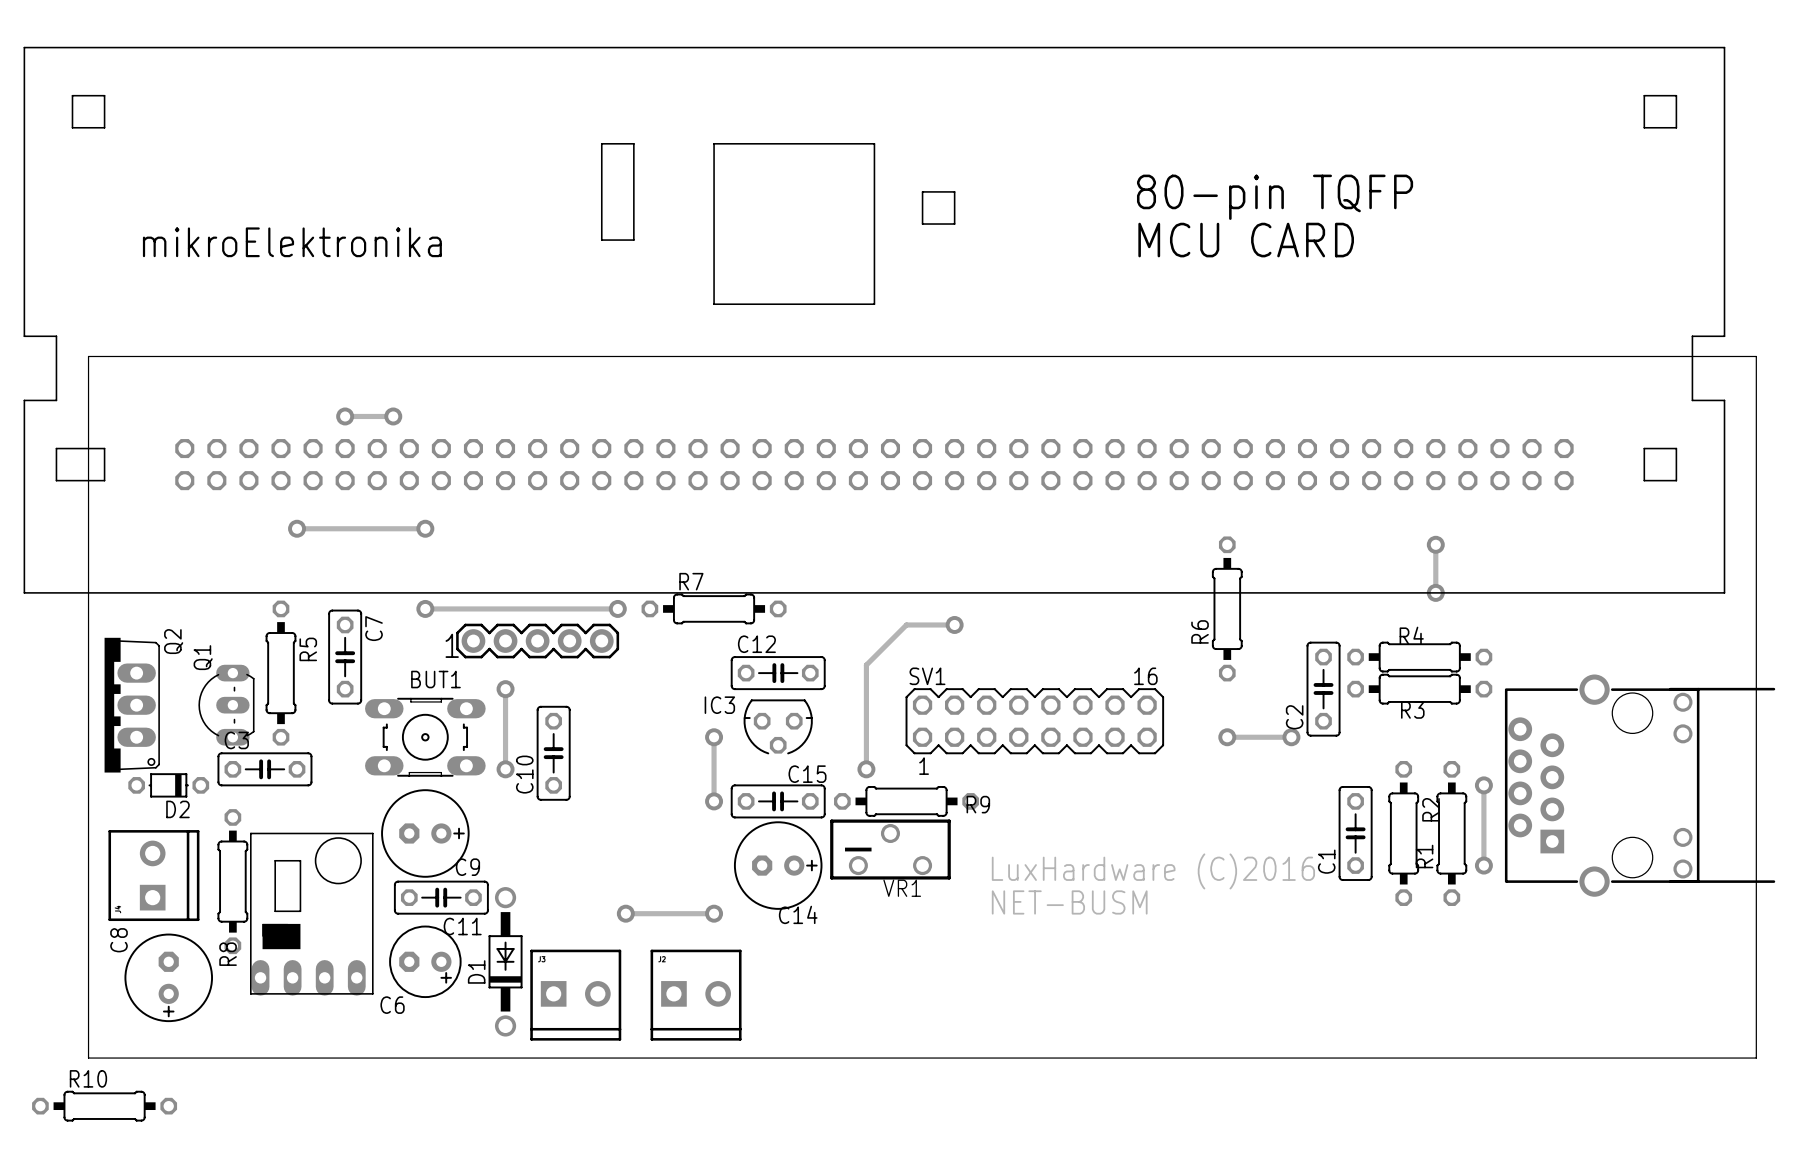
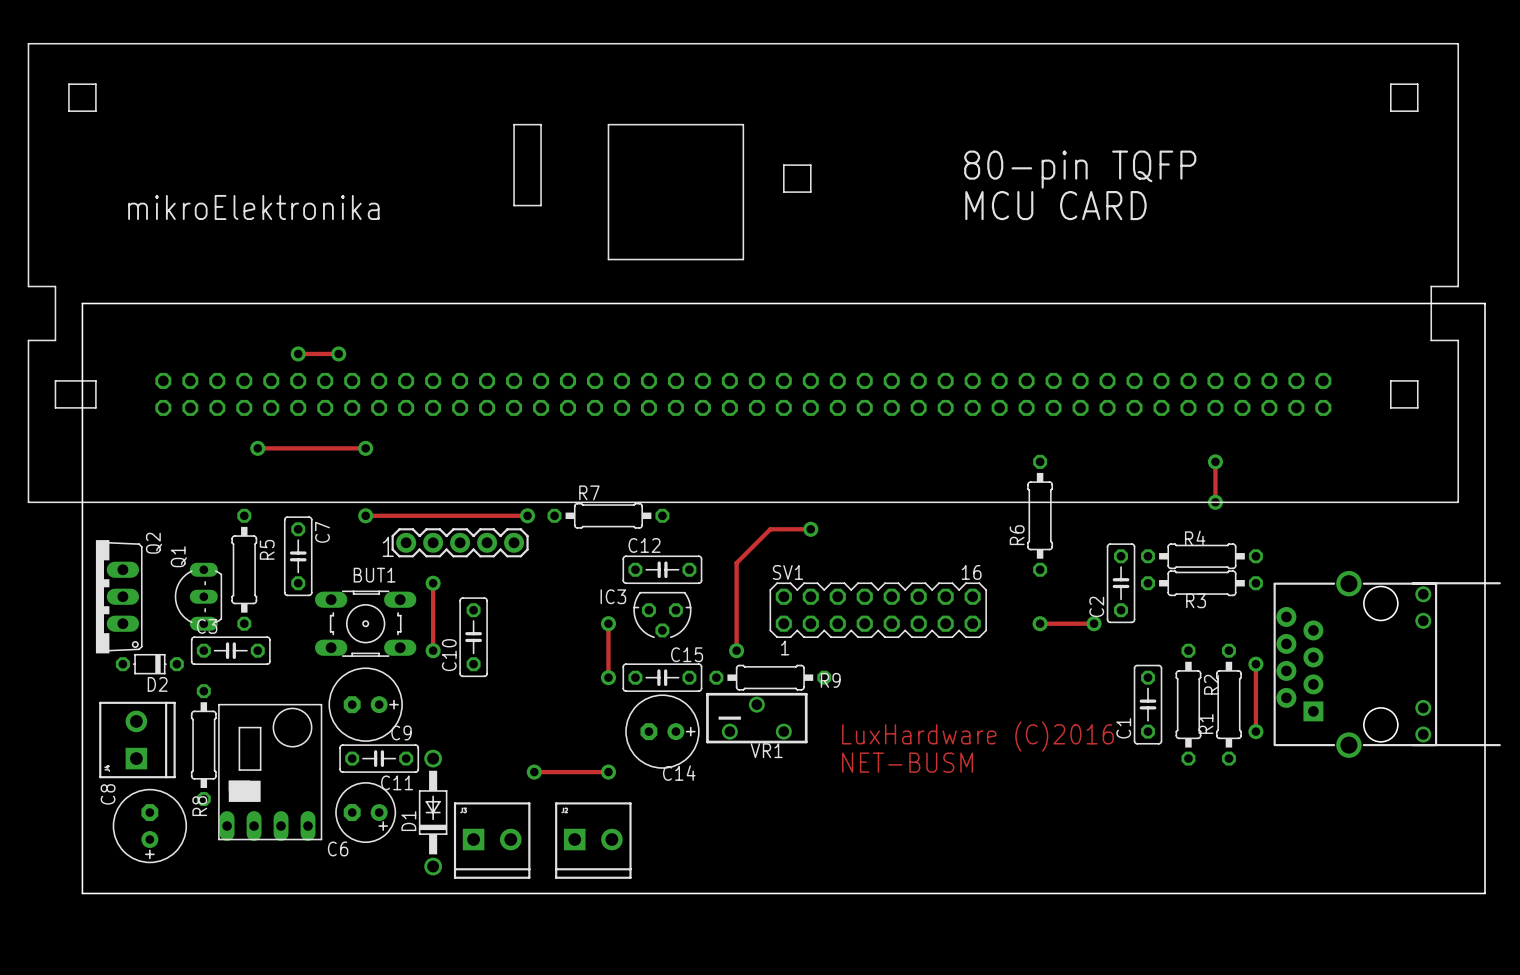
R10: (104, 1106) -> none

